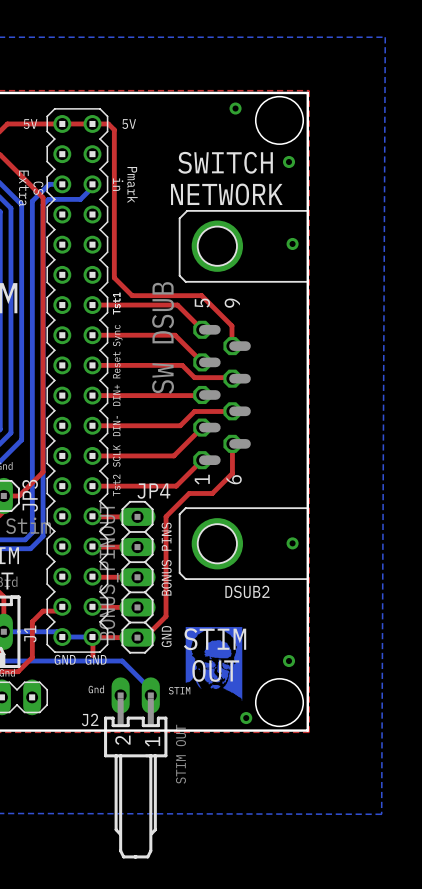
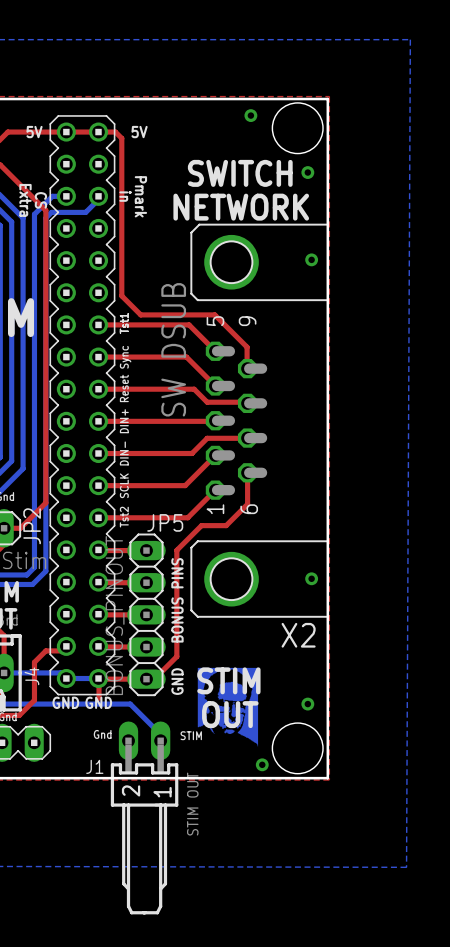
JP4 name: JP4 (153, 491) -> JP5 (165, 522)
JP3 name: JP3 (30, 495) -> JP2 (32, 526)
DSUB2 name: DSUB2 (247, 591) -> X2 (298, 635)
J1 name: J1 (30, 633) -> J4 (31, 676)
J2 name: J2 (90, 719) -> J1 (94, 766)

